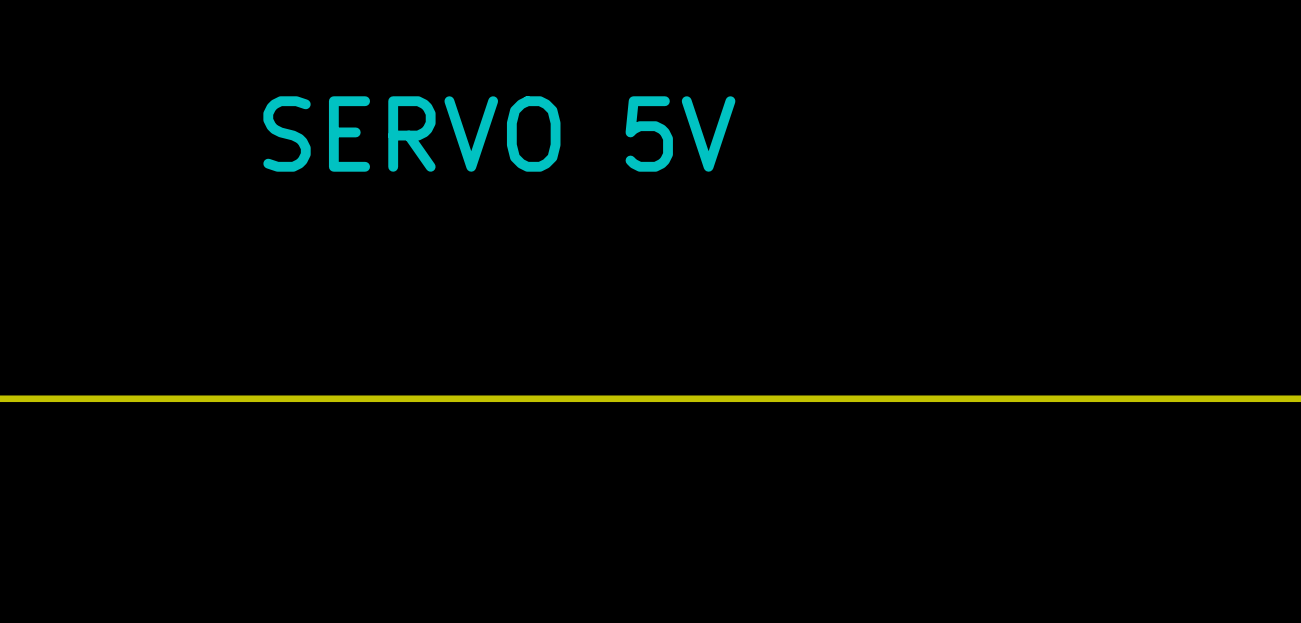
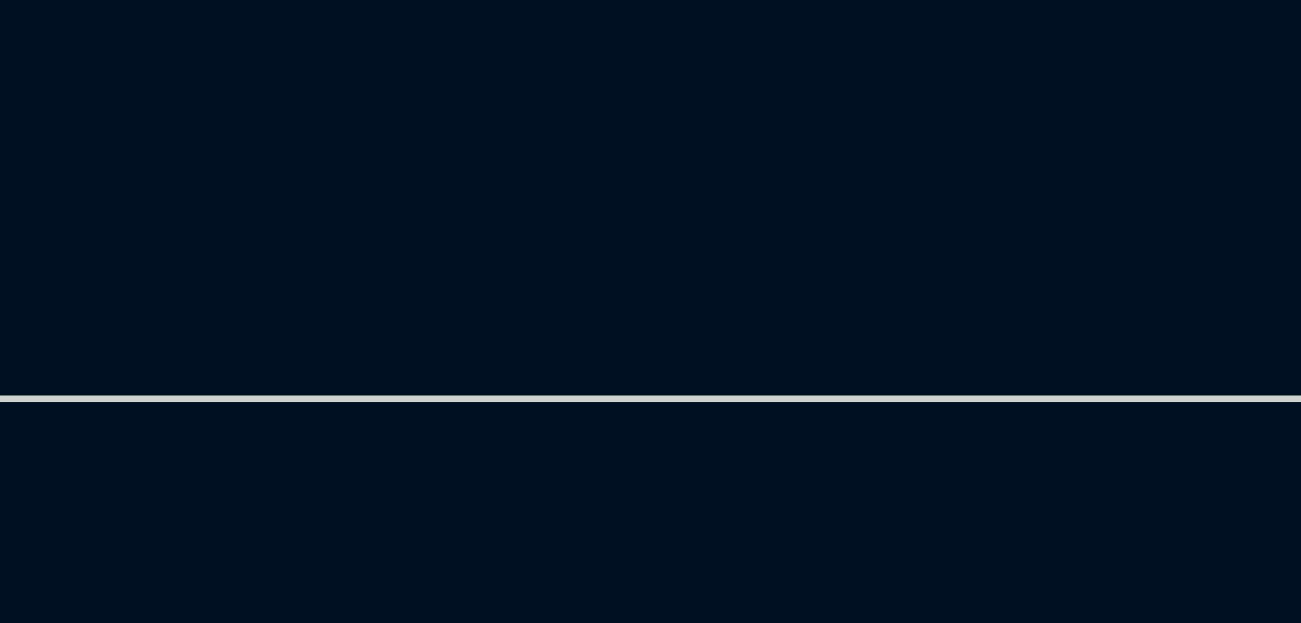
text: SERVO 5V (499, 133) -> none

